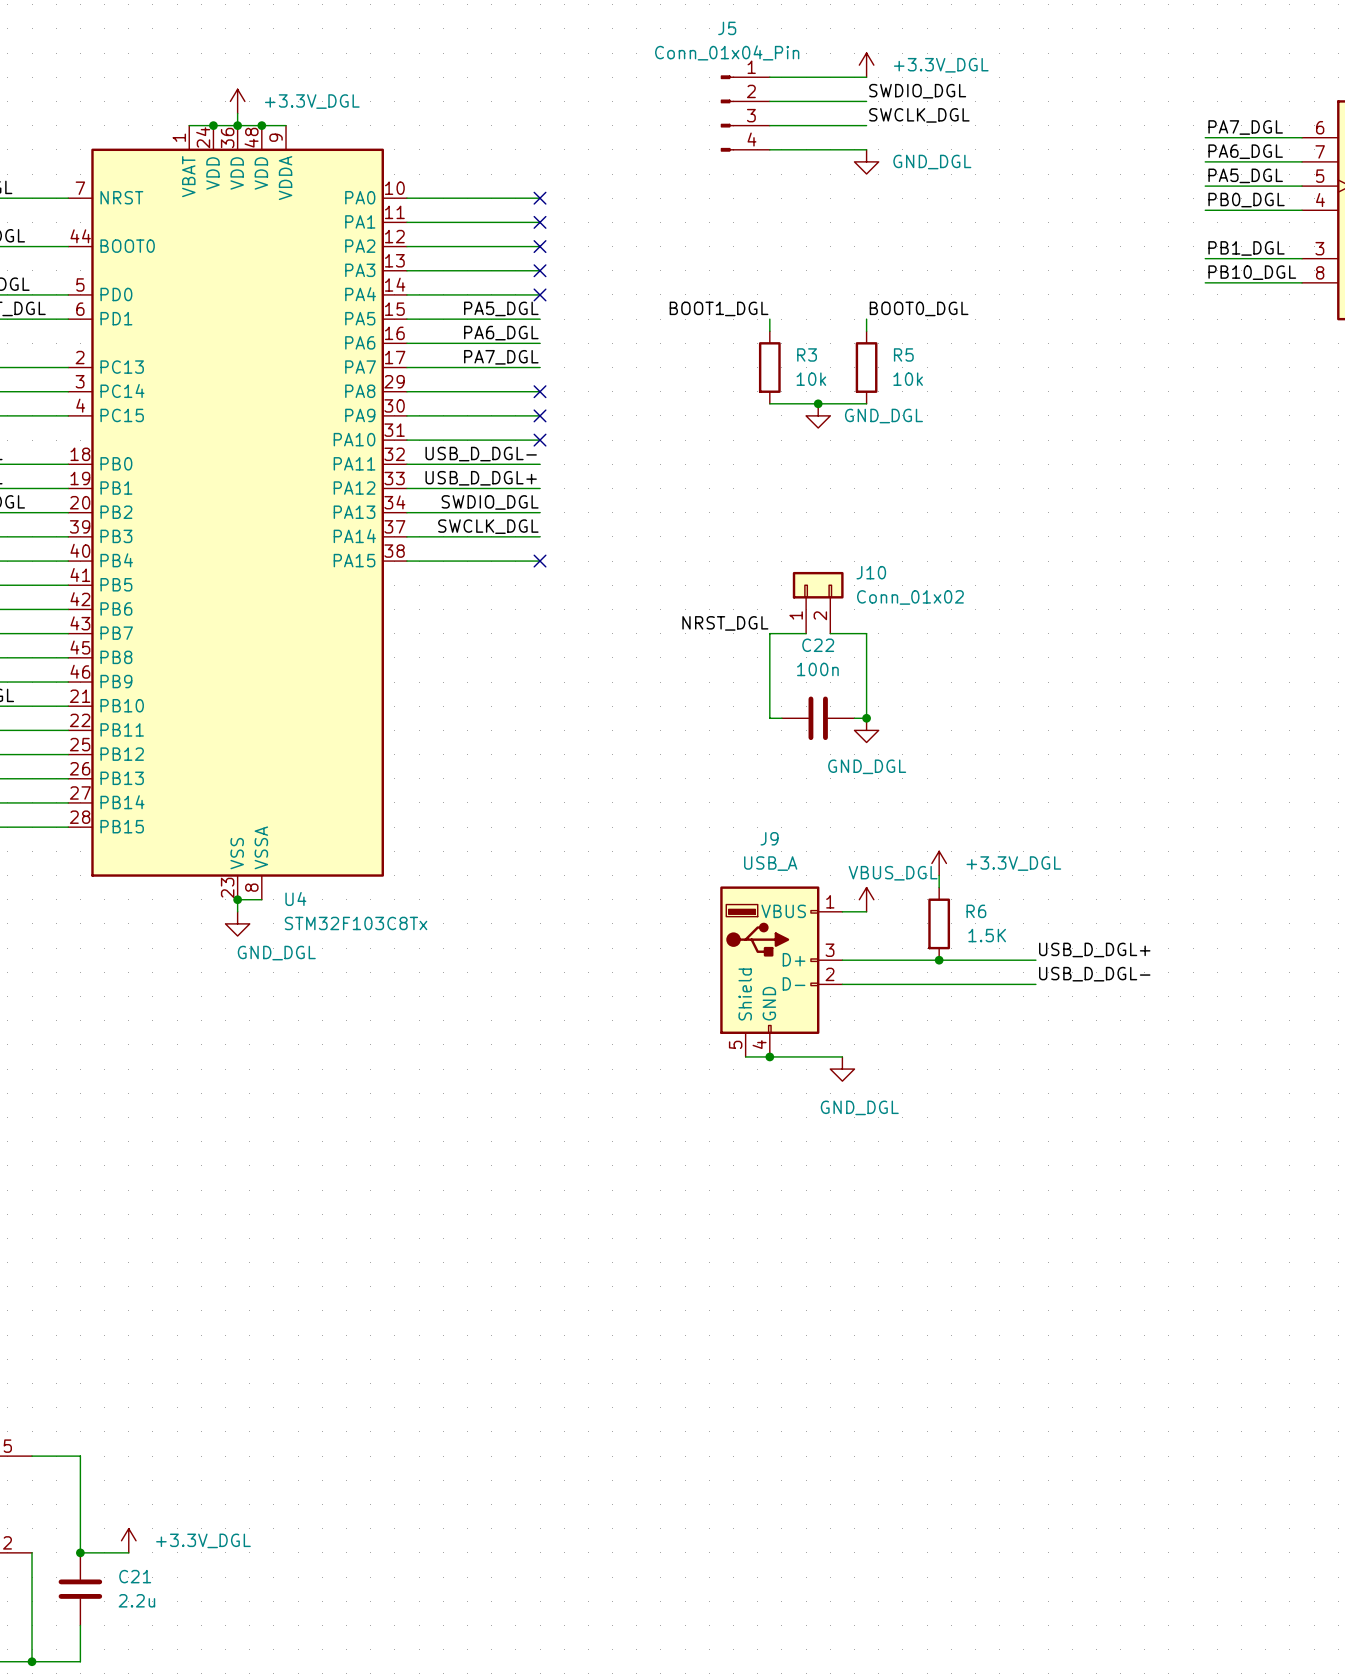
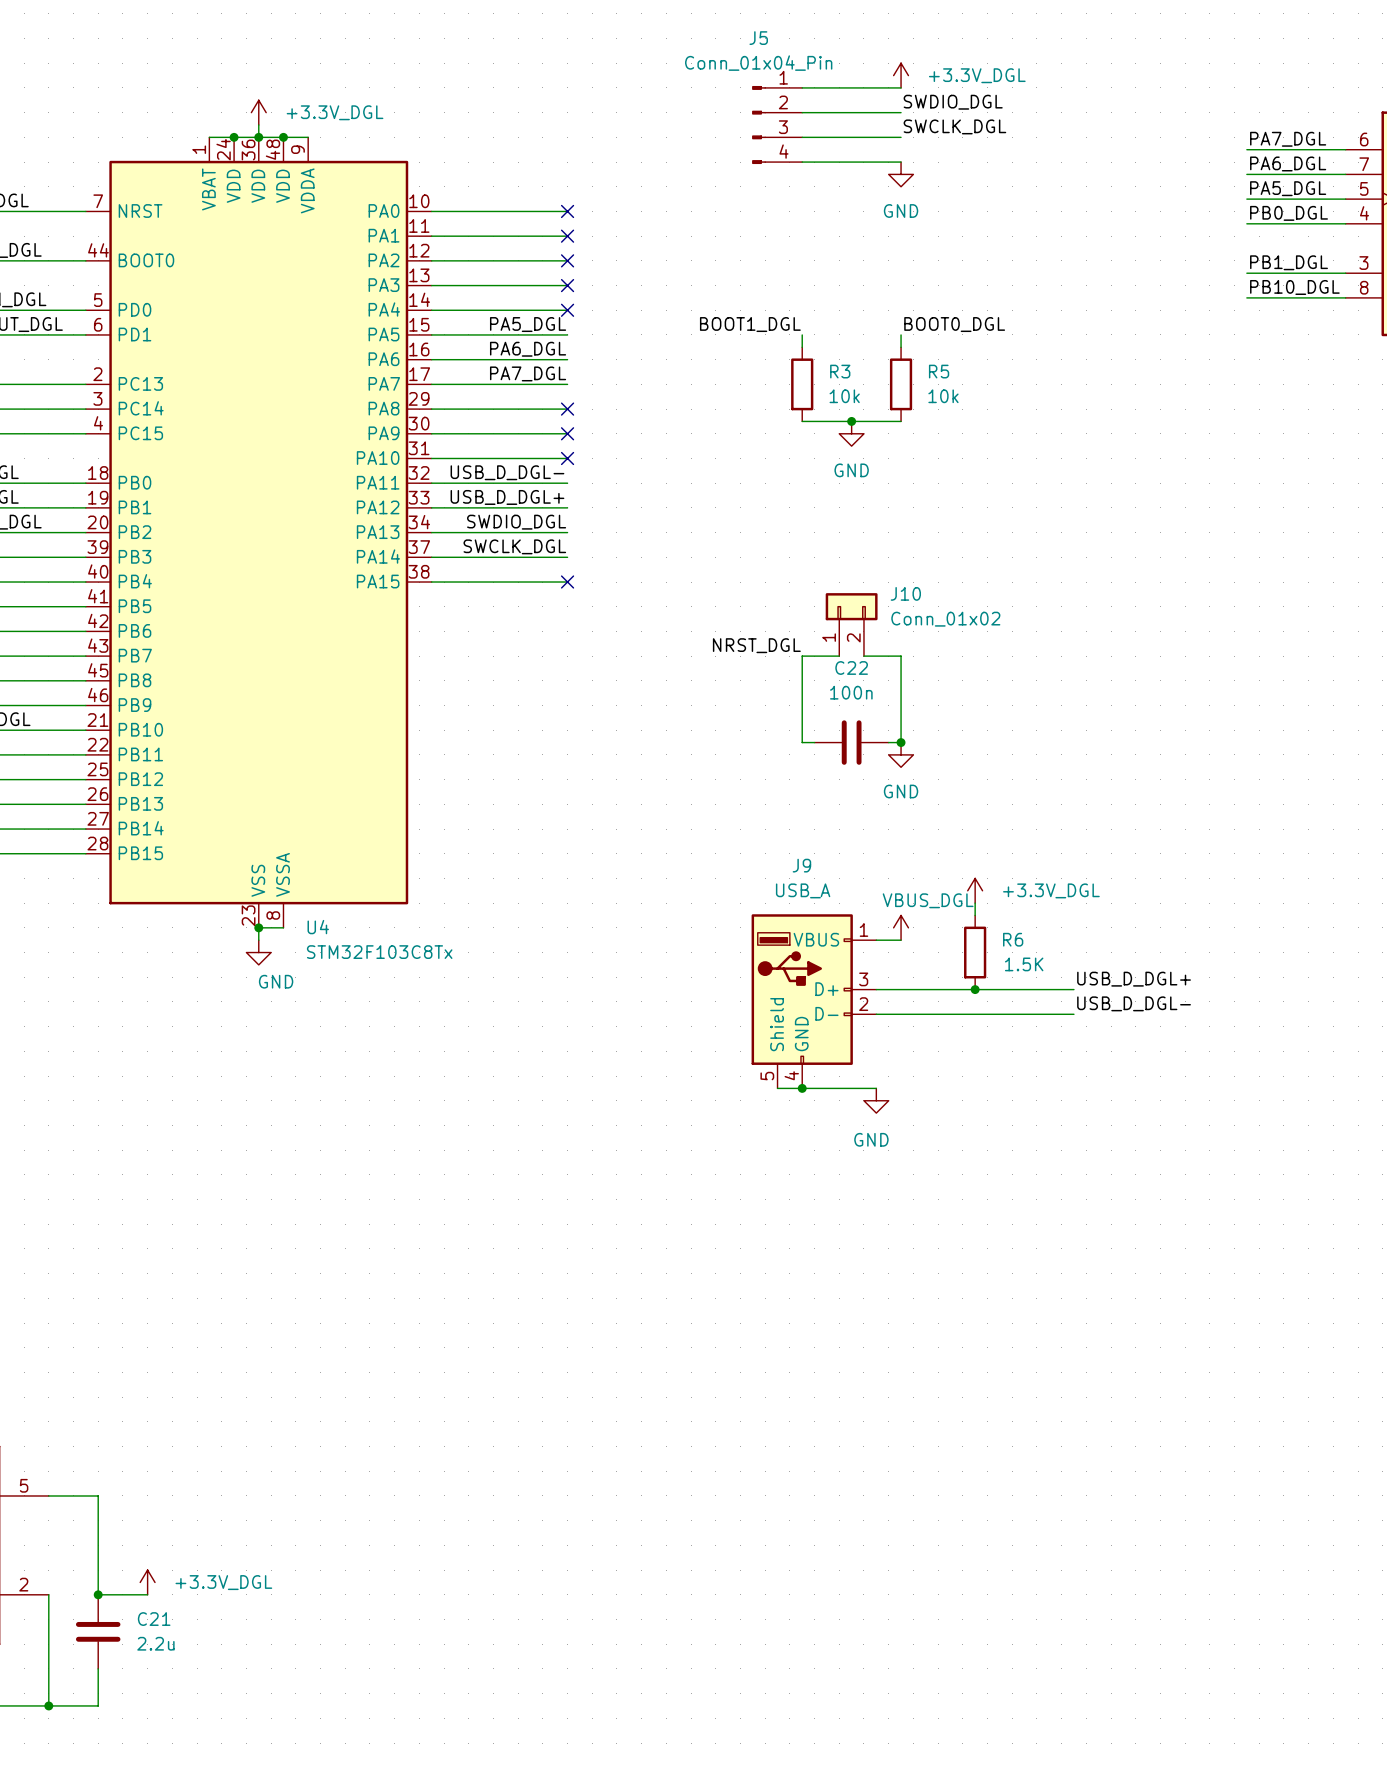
power symbol: GND_DGL (866, 161) -> GND (901, 174)
power symbol: GND_DGL (818, 415) -> GND (851, 433)
power symbol: GND_DGL (866, 730) -> GND (901, 754)
power symbol: GND_DGL (237, 923) -> GND (258, 952)
power symbol: GND_DGL (842, 1069) -> GND (876, 1100)

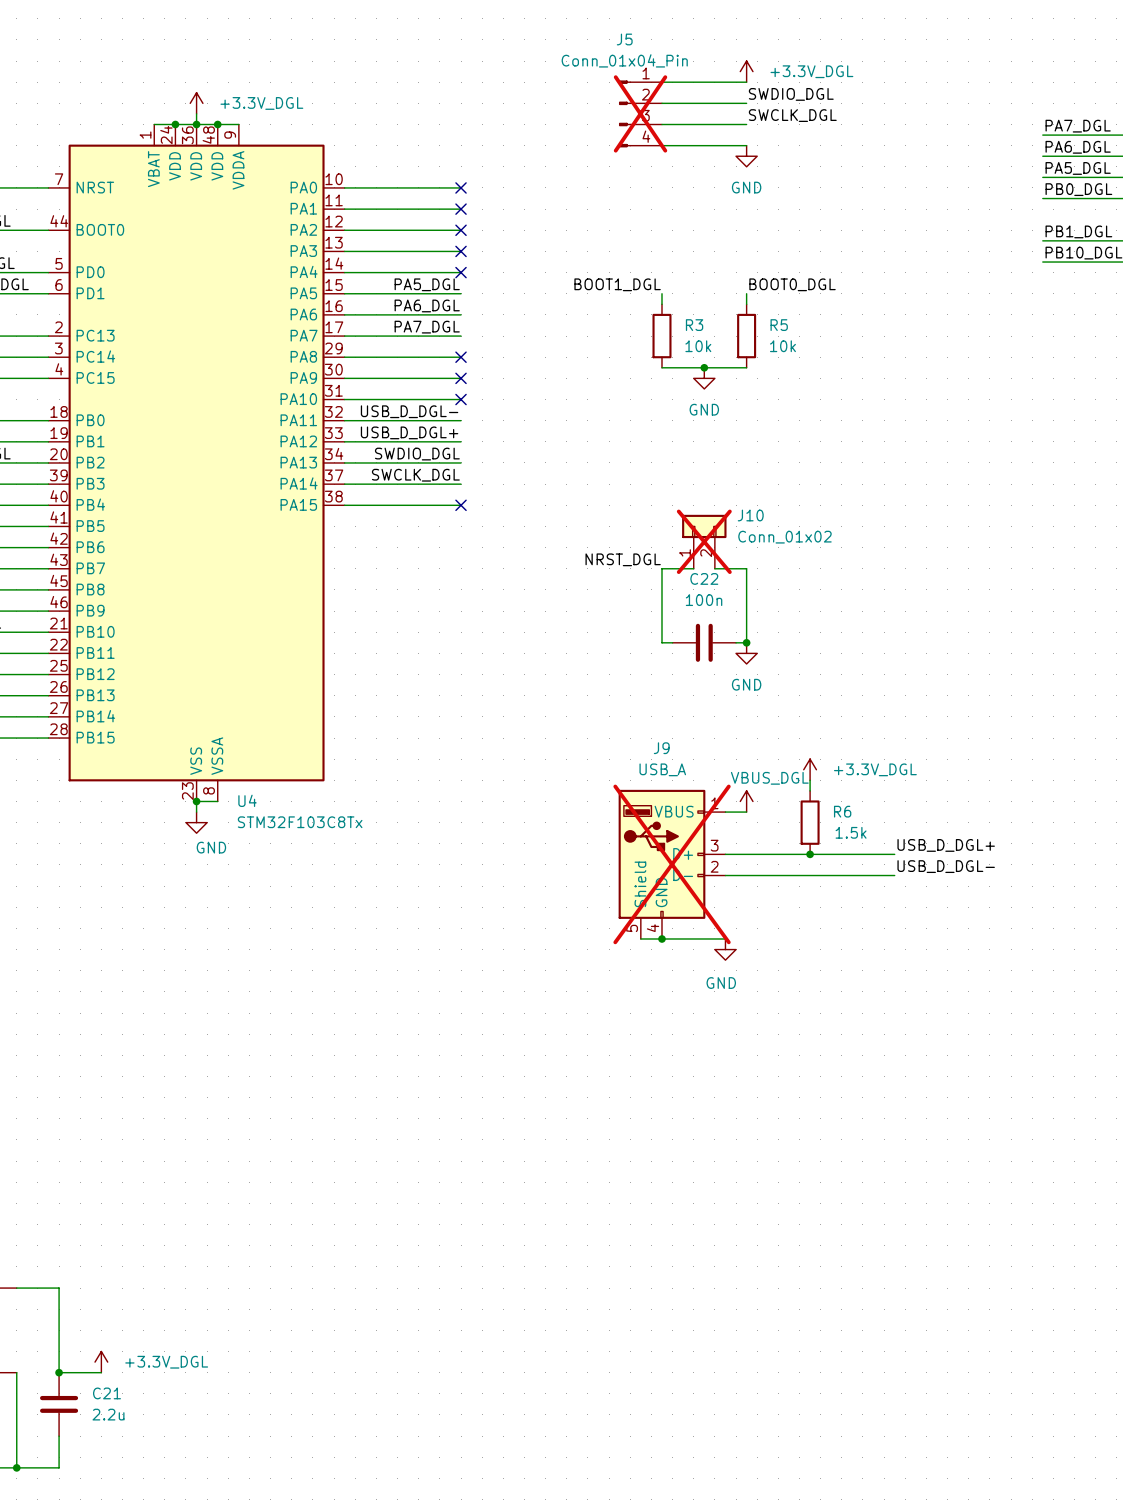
J5 do-not-place cross: none -> (640, 113)
J10 do-not-place cross: none -> (704, 541)
R6 value: 1.5K (1024, 964) -> 1.5k (851, 832)
J9 do-not-place cross: none -> (672, 864)

